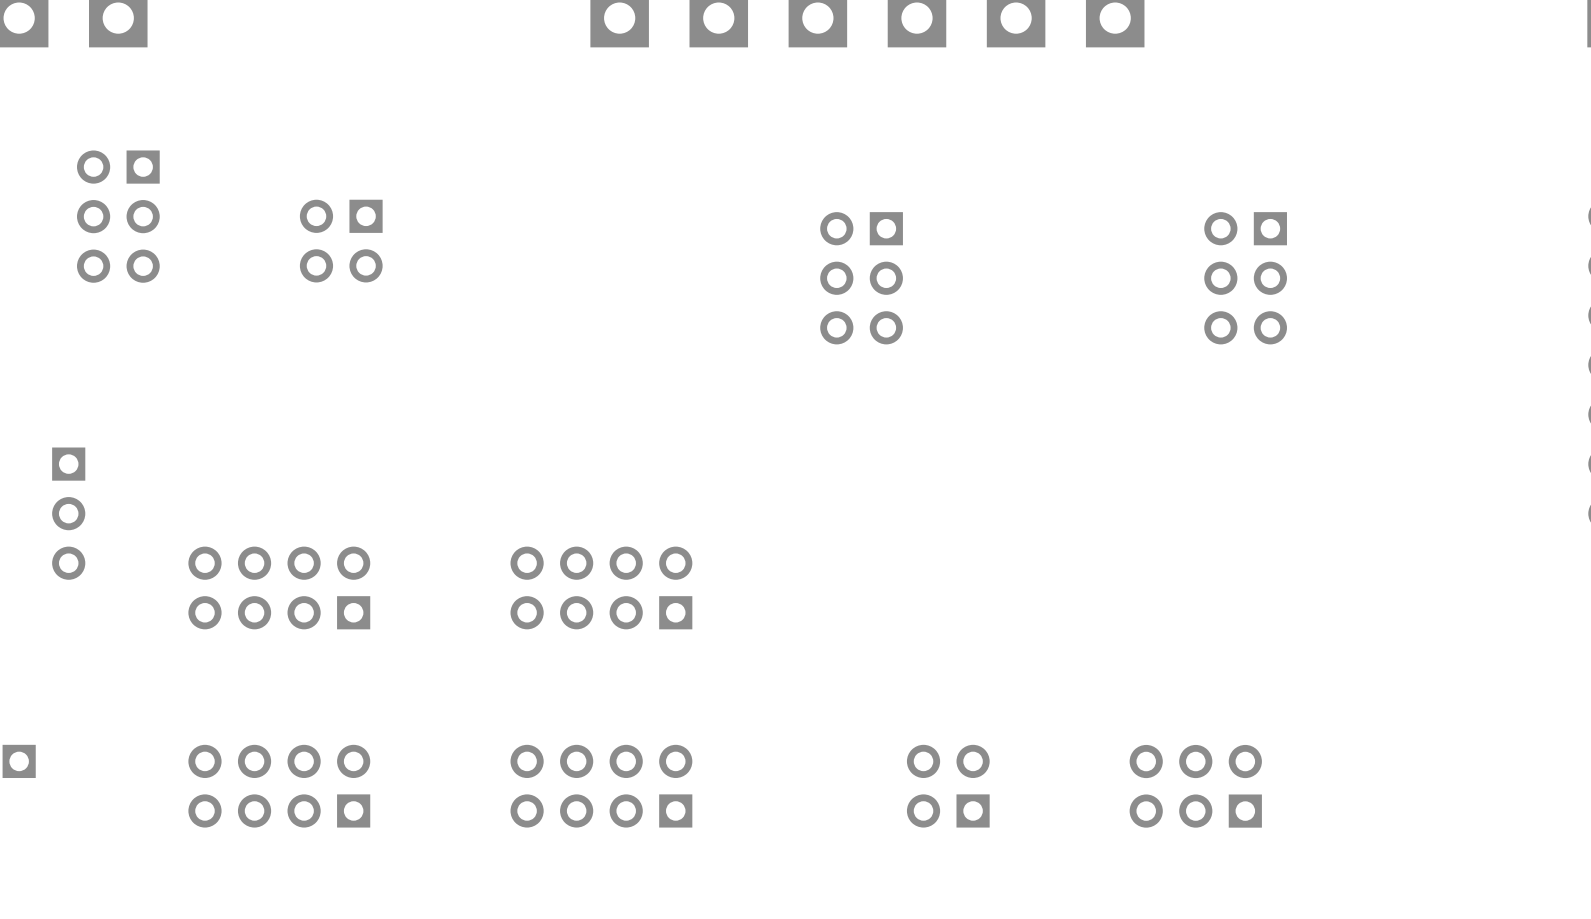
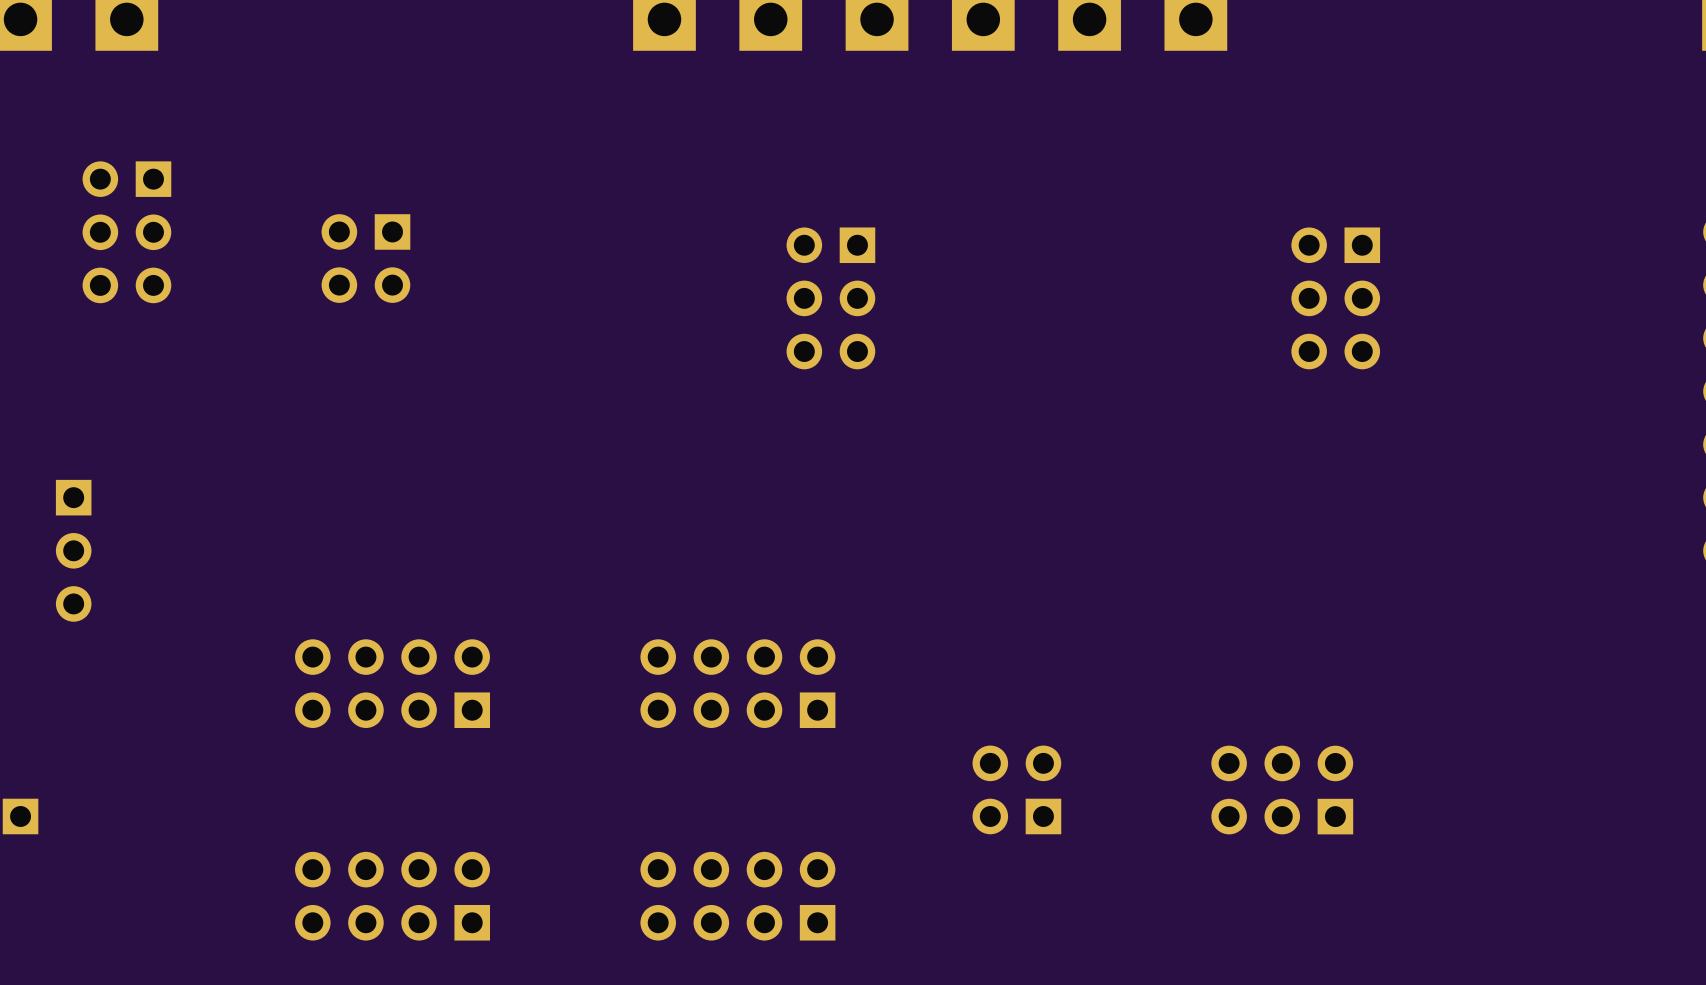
part position: (861, 278) -> (830, 298)
part: (279, 587) -> none
part: (601, 587) -> none
part: none -> (392, 683)
part: none -> (737, 683)
part: (279, 786) -> none
part: (601, 786) -> none
part position: (948, 786) -> (1016, 789)
part position: (1195, 786) -> (1282, 790)
part: none -> (392, 896)
part: none -> (737, 896)

